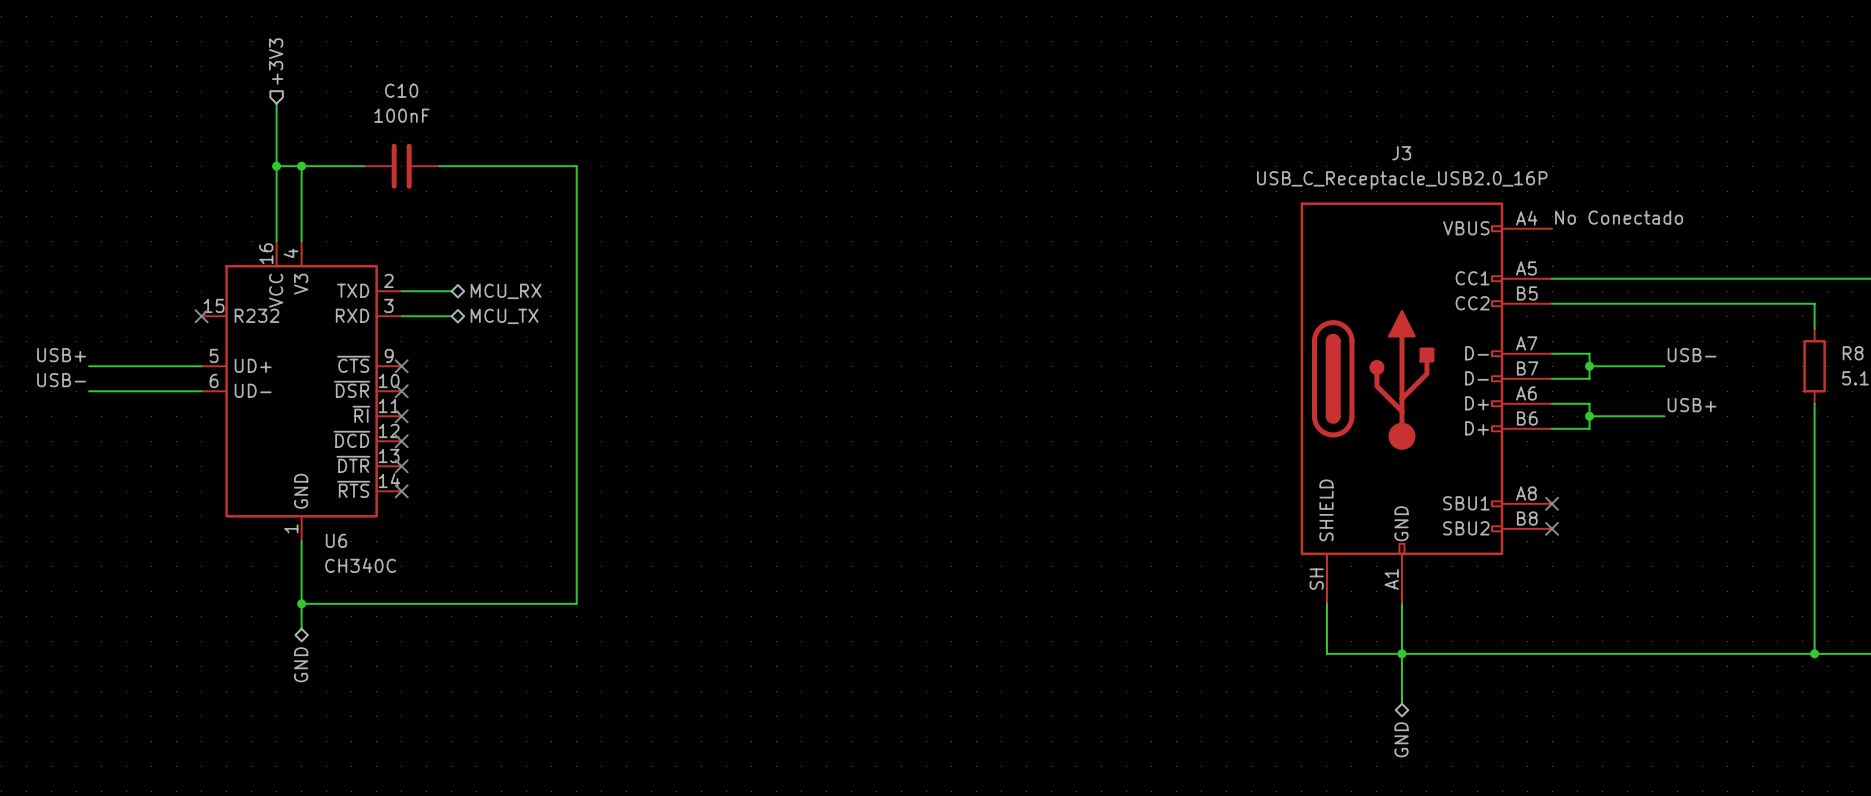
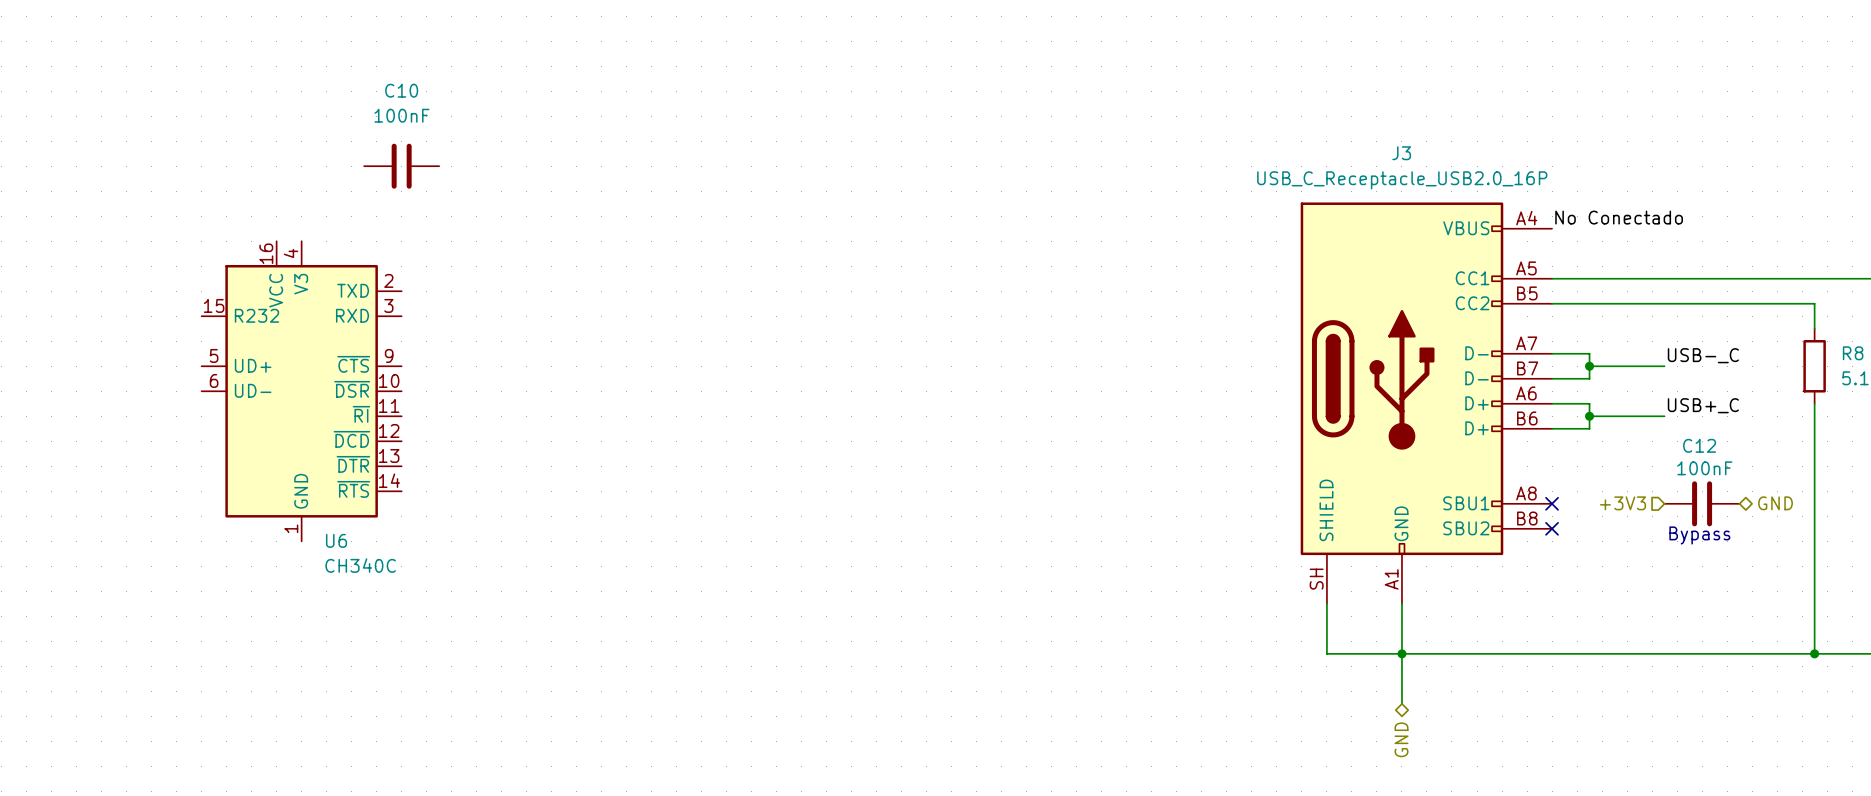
hierarchical label: +3V3 (276, 61) -> none
wire: (276, 103) (276, 241) -> none
wire: (276, 166) (364, 166) -> none
junction: (276, 166) -> none
wire: (301, 166) (301, 241) -> none
junction: (301, 166) -> none
wire: (439, 166) (576, 166) (576, 603) (301, 603) -> none
wire: (401, 291) (451, 291) -> none
hierarchical label: MCU_RX (506, 291) -> none
no-connect mark: (201, 316) -> none
wire: (401, 316) (451, 316) -> none
hierarchical label: MCU_TX (504, 316) -> none
label: USB+ (61, 355) -> none
label: USB- (1692, 355) -> USB-_C (1703, 355)
wire: (89, 366) (201, 366) -> none
no-connect mark: (401, 366) -> none
label: USB- (61, 380) -> none
wire: (89, 391) (201, 391) -> none
no-connect mark: (401, 391) -> none
label: USB+ (1692, 405) -> USB+_C (1703, 405)
no-connect mark: (401, 416) -> none
no-connect mark: (401, 441) -> none
no-connect mark: (401, 466) -> none
no-connect mark: (401, 491) -> none
hierarchical label: none -> +3V3 (1622, 503)
C12: none -> 100nF (1702, 503)
hierarchical label: none -> GND (1775, 503)
text: none -> Bypass (1699, 535)
wire: (301, 541) (301, 628) -> none
junction: (301, 603) -> none
hierarchical label: GND (301, 664) -> none

